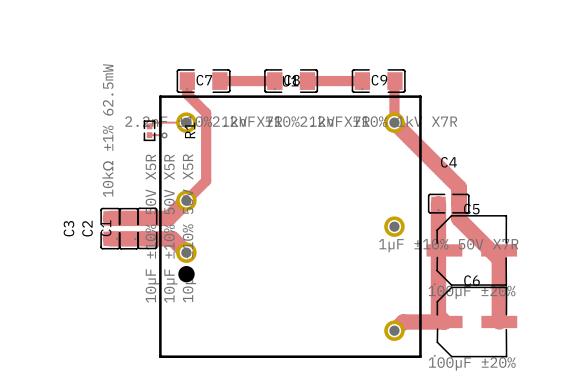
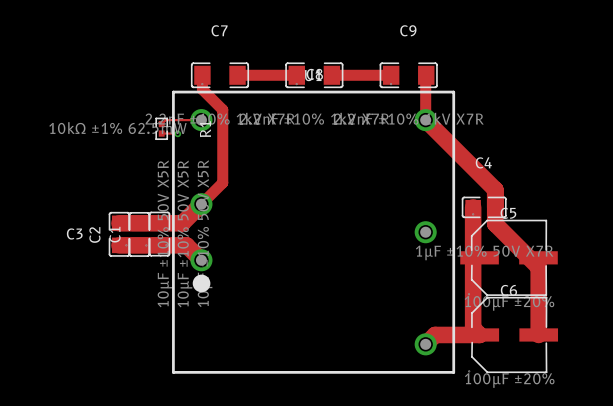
C7 name position: C7 (204, 80) -> C7 (219, 30)
C9 name position: C9 (379, 80) -> C9 (408, 30)
R1 value rotation: 0° (107, 130) -> 90° clockwise (117, 128)
C3 name rotation: 0° (68, 228) -> 90° clockwise (74, 233)

